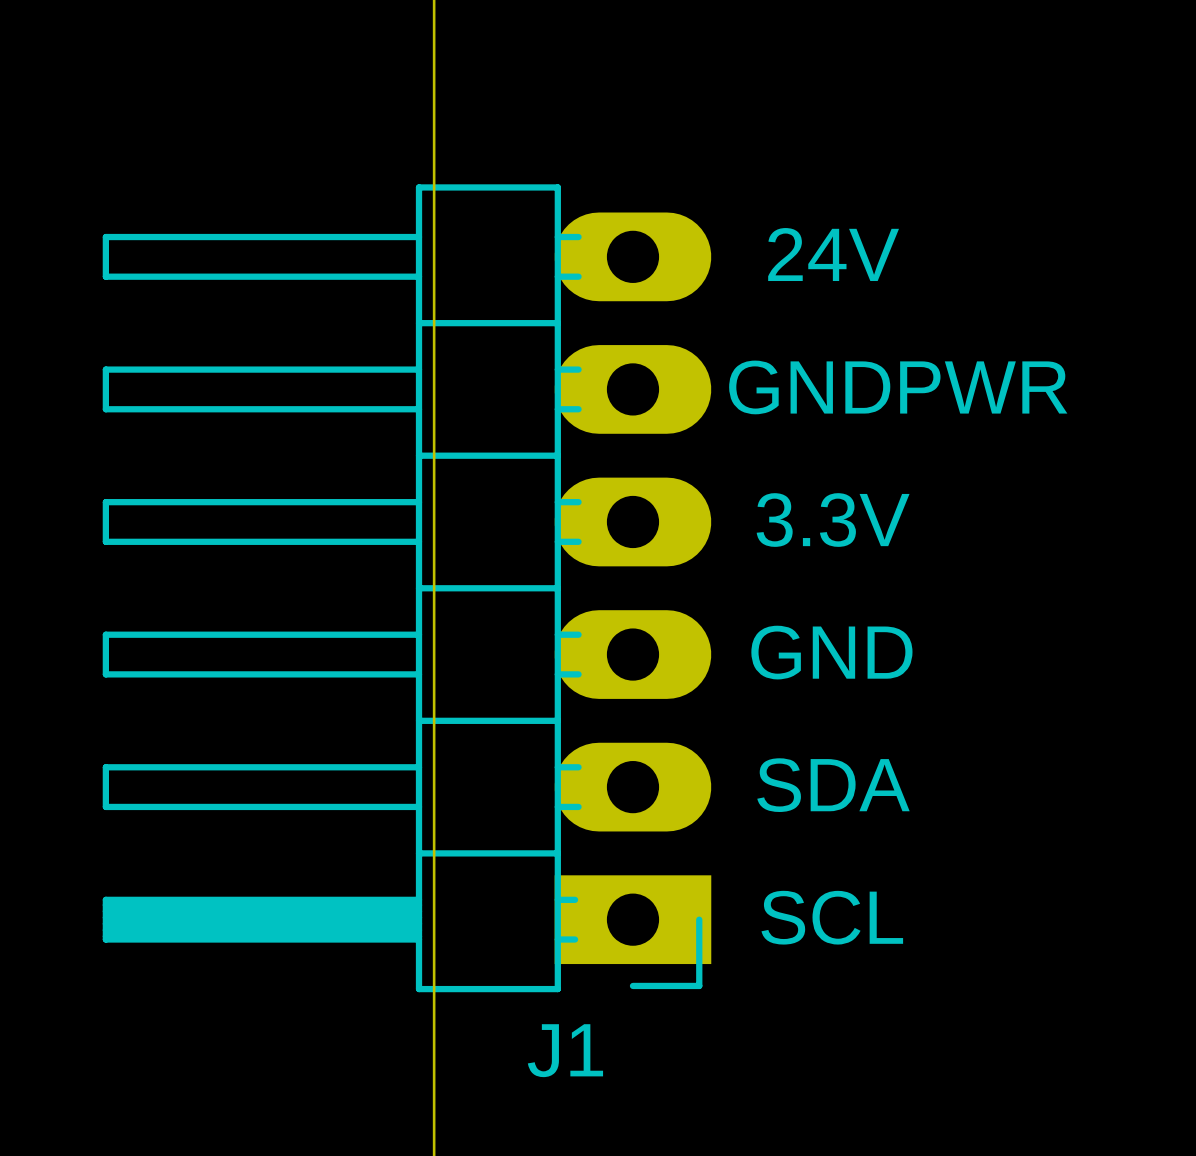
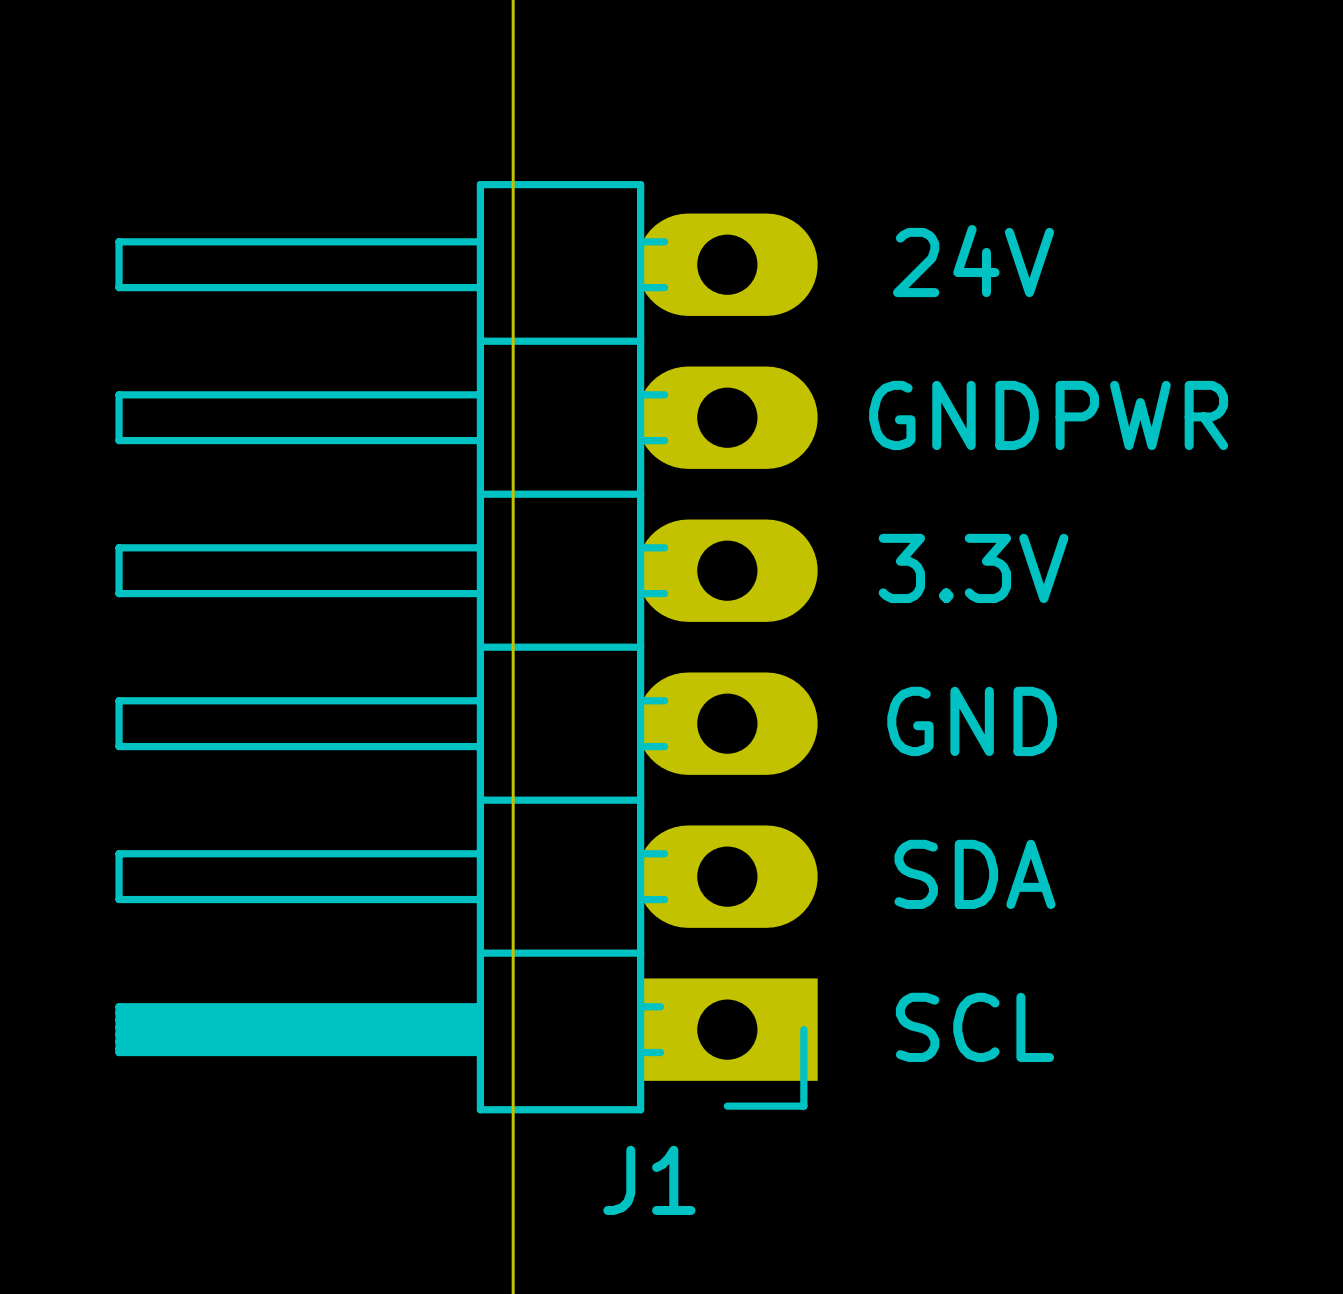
J1 position: (407, 588) -> (466, 647)

